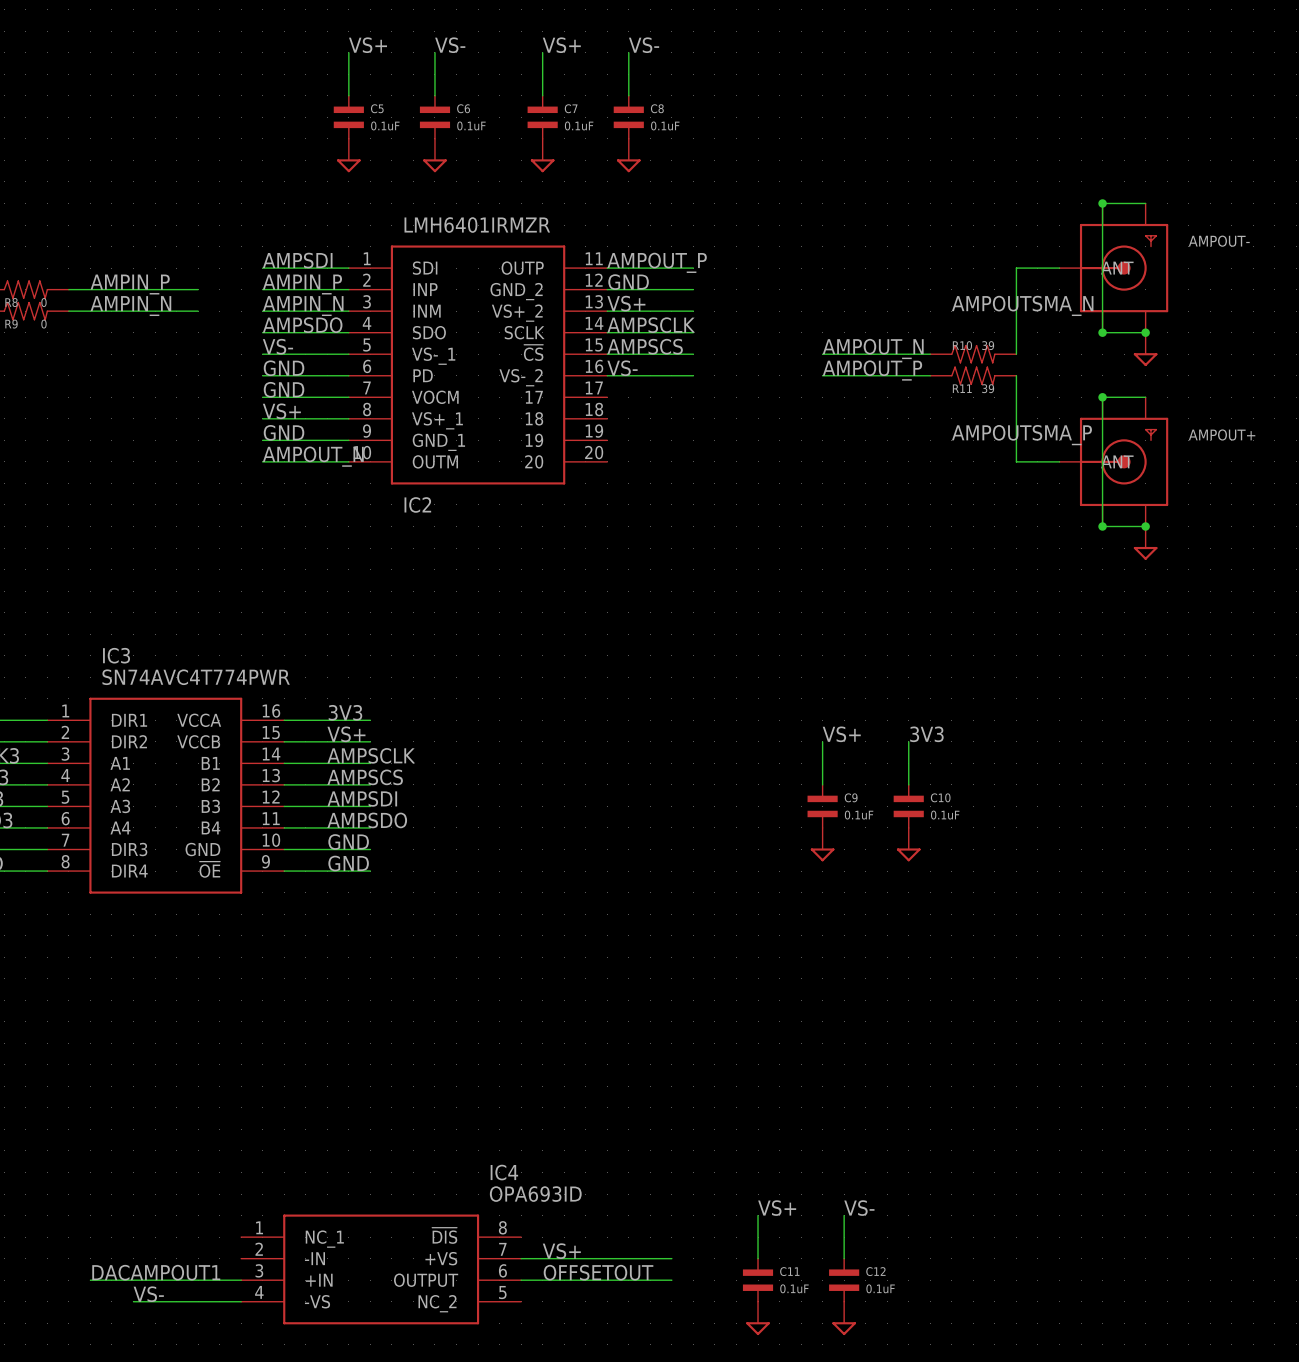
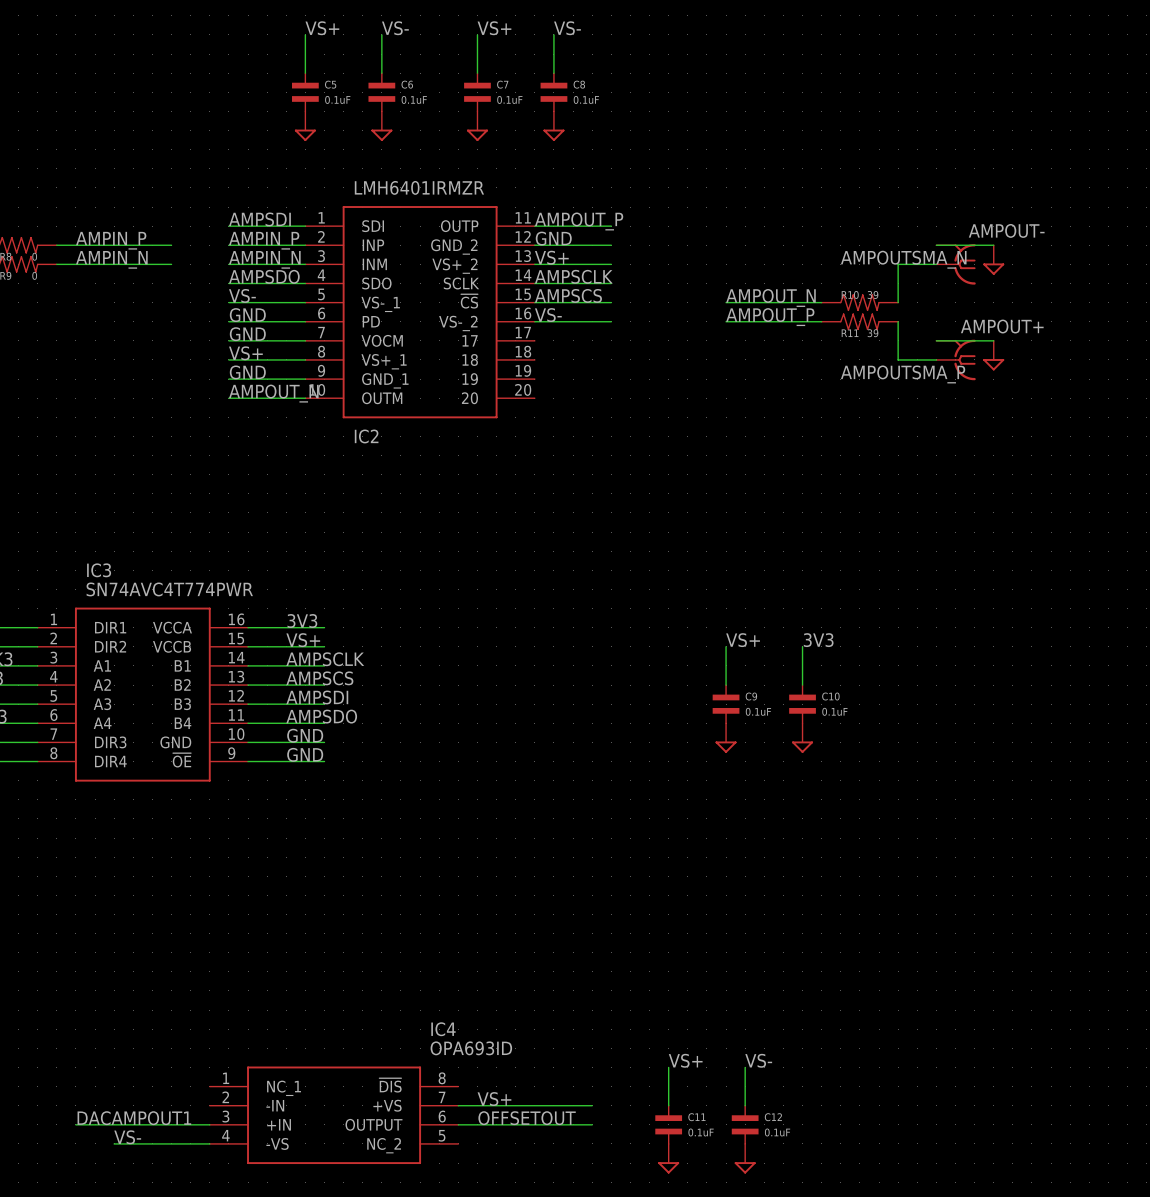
junction: (1102, 203) -> none
wire: (1145, 203) (1102, 203) (1102, 332) (1145, 332) -> none
wire: (1059, 268) (1016, 268) (1016, 311) -> (936, 264) (898, 264)
AMPOUT-: (1113, 268) -> none
wire: none -> (936, 245) (993, 245)
power symbol: none -> (993, 260)
AMPOUT-: none -> (956, 264)
junction: (1102, 332) -> none
junction: (1145, 332) -> none
power symbol: (1145, 349) -> none
wire: (1102, 397) (1102, 526) (1145, 526) -> (974, 340) (936, 340)
junction: (1102, 397) -> none
wire: (1124, 397) (1145, 397) -> none
power symbol: none -> (993, 355)
wire: (1016, 418) (1016, 461) (1059, 461) -> (898, 359) (936, 359)
AMPOUT+: none -> (956, 359)
AMPOUT+: (1113, 461) -> none
junction: (1102, 526) -> none
junction: (1145, 526) -> none
power symbol: (1145, 543) -> none

